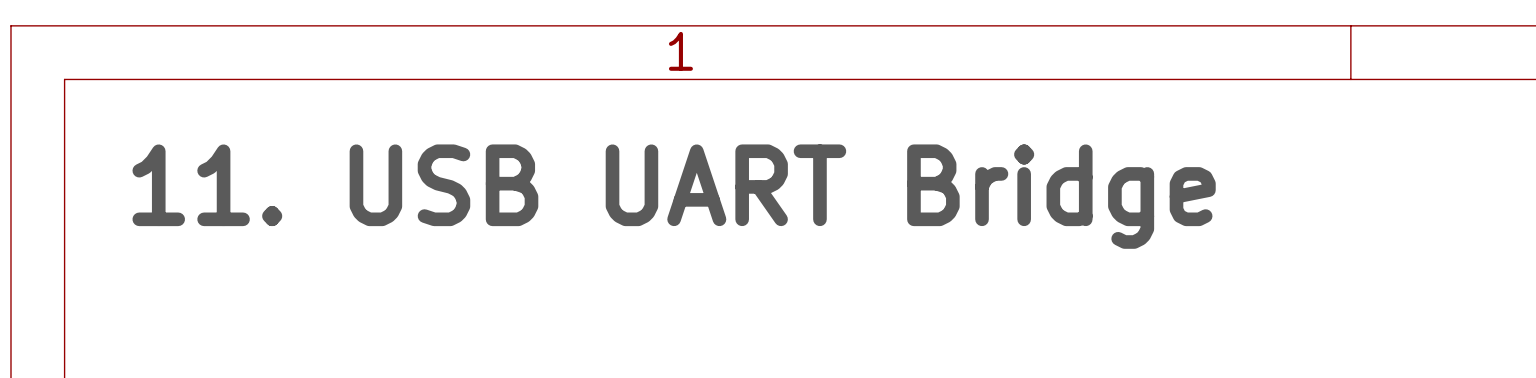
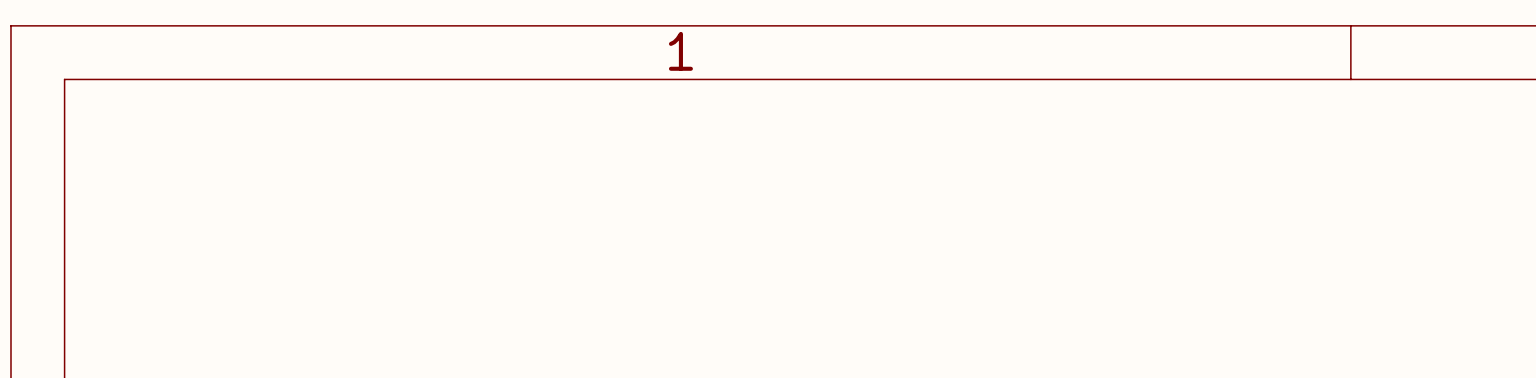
text: 11. USB UART Bridge (674, 196) -> none

